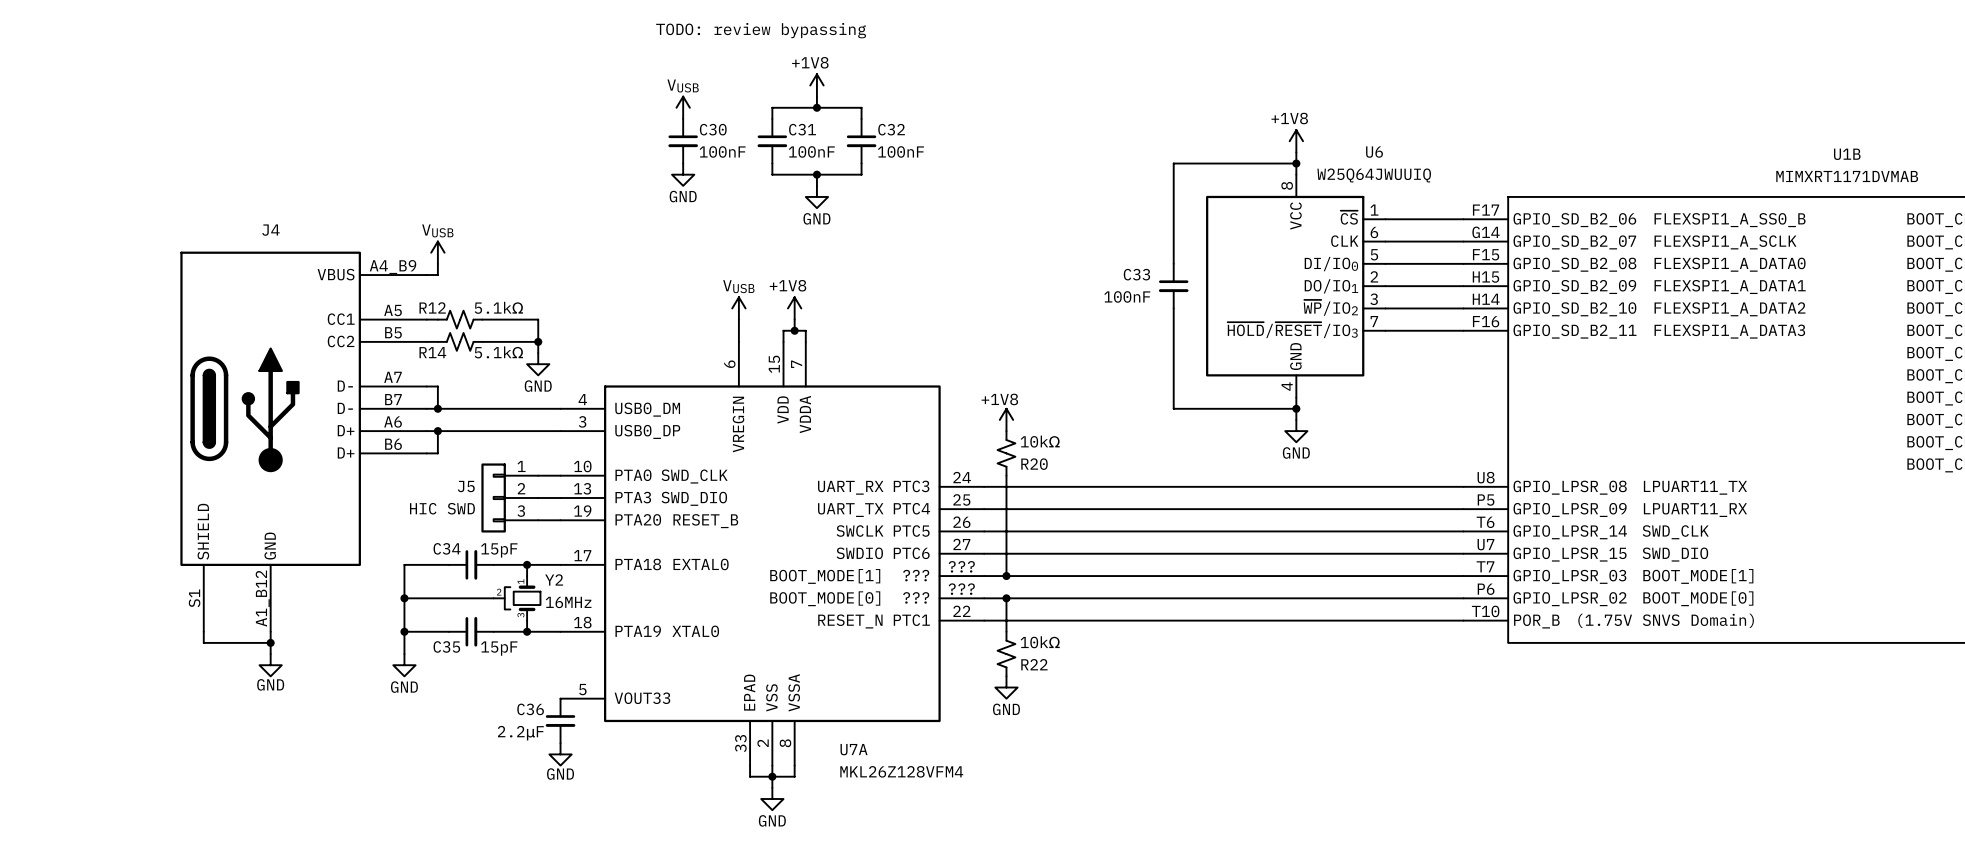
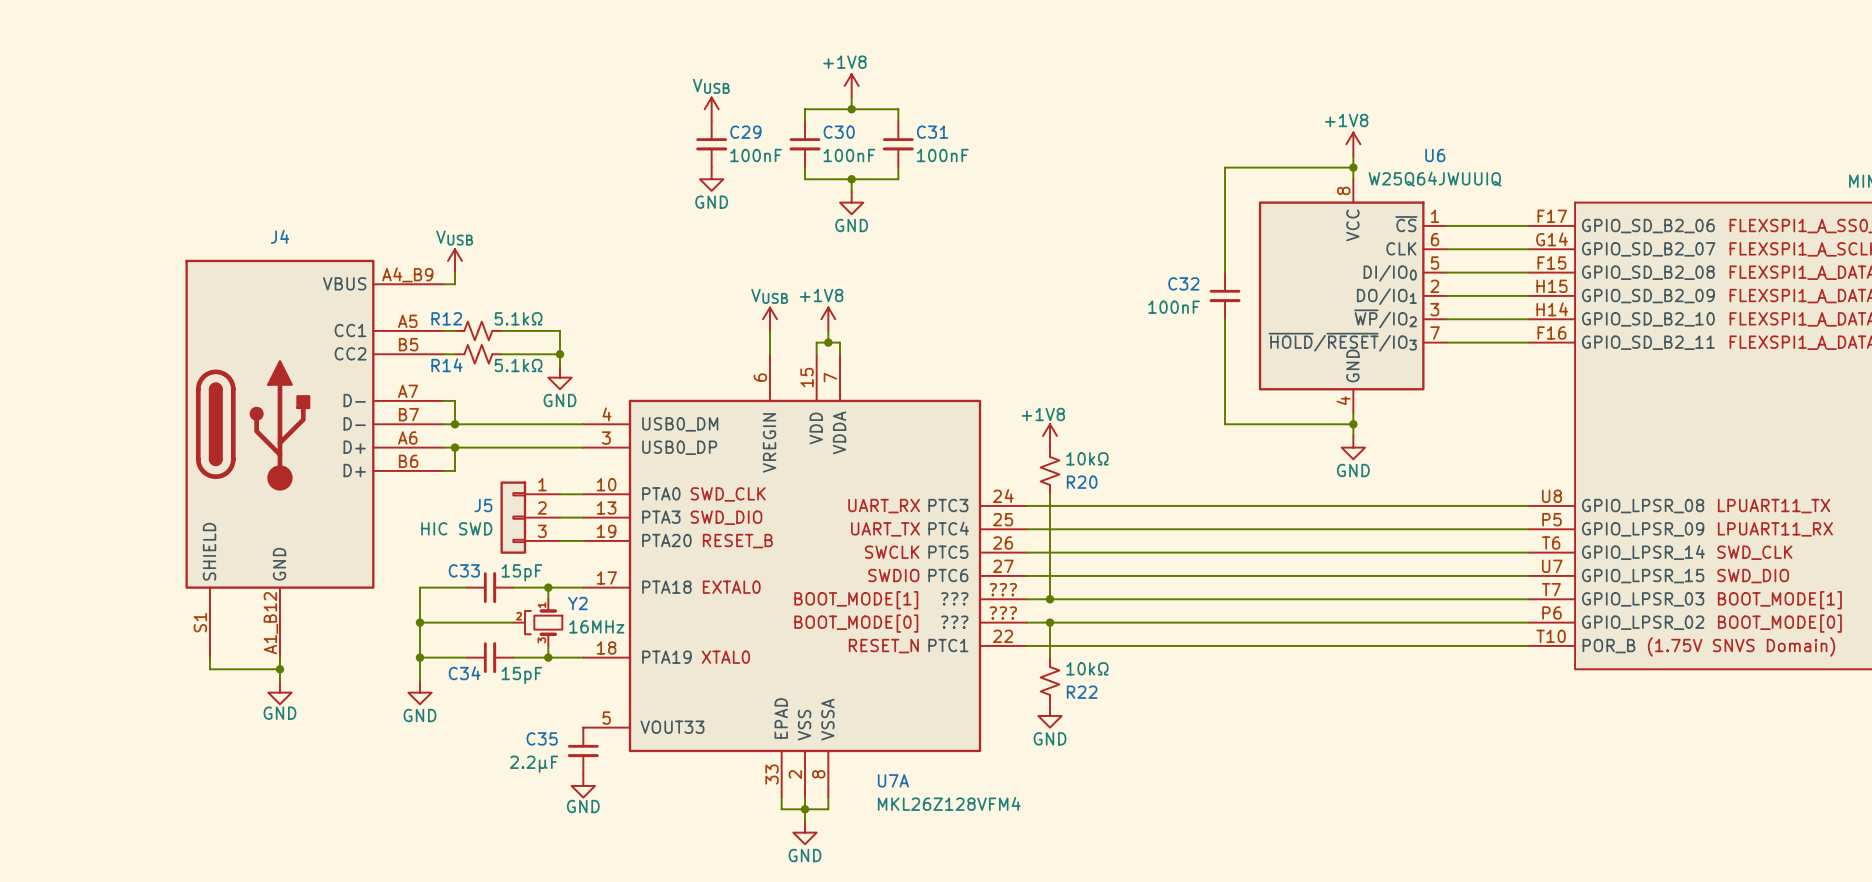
text: TODO: review bypassing (761, 30) -> none
C30 name: C30 (713, 129) -> C29 (745, 132)
C31 name: C31 (802, 129) -> C30 (839, 132)
C32 name: C32 (891, 129) -> C31 (932, 132)
C33 name: C33 (1136, 274) -> C32 (1183, 283)
C34 name: C34 (447, 548) -> C33 (464, 570)
C35 name: C35 (446, 646) -> C34 (464, 673)
C36 name: C36 (530, 709) -> C35 (542, 738)
C36 value: 2.2μF (520, 733) -> 2.2µF (534, 764)

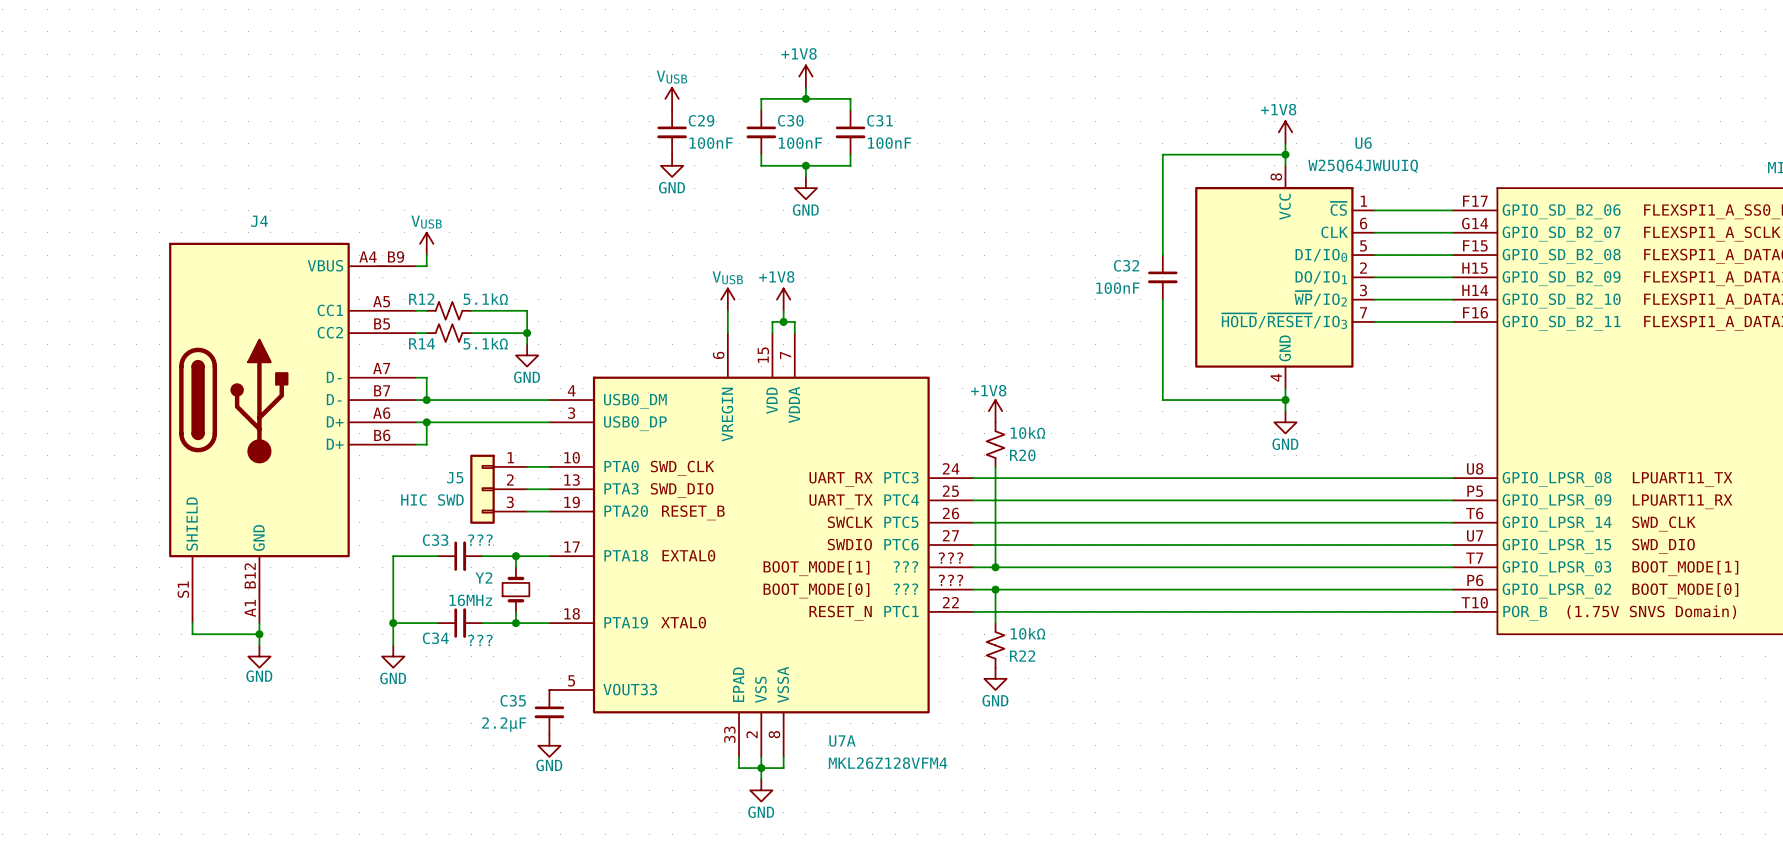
C33 value: 15pF (521, 572) -> ??? (480, 540)
Y2 symbol: [513, 599, 563, 646] -> [502, 567, 530, 612]
Y2 name position: Y2 (577, 603) -> Y2 (483, 577)
wire: (419, 622) (513, 622) -> none
junction: (419, 622) -> none
Y2 value position: 16MHz (596, 626) -> 16MHz (470, 600)
C34 value: 15pF (521, 675) -> ??? (480, 640)

